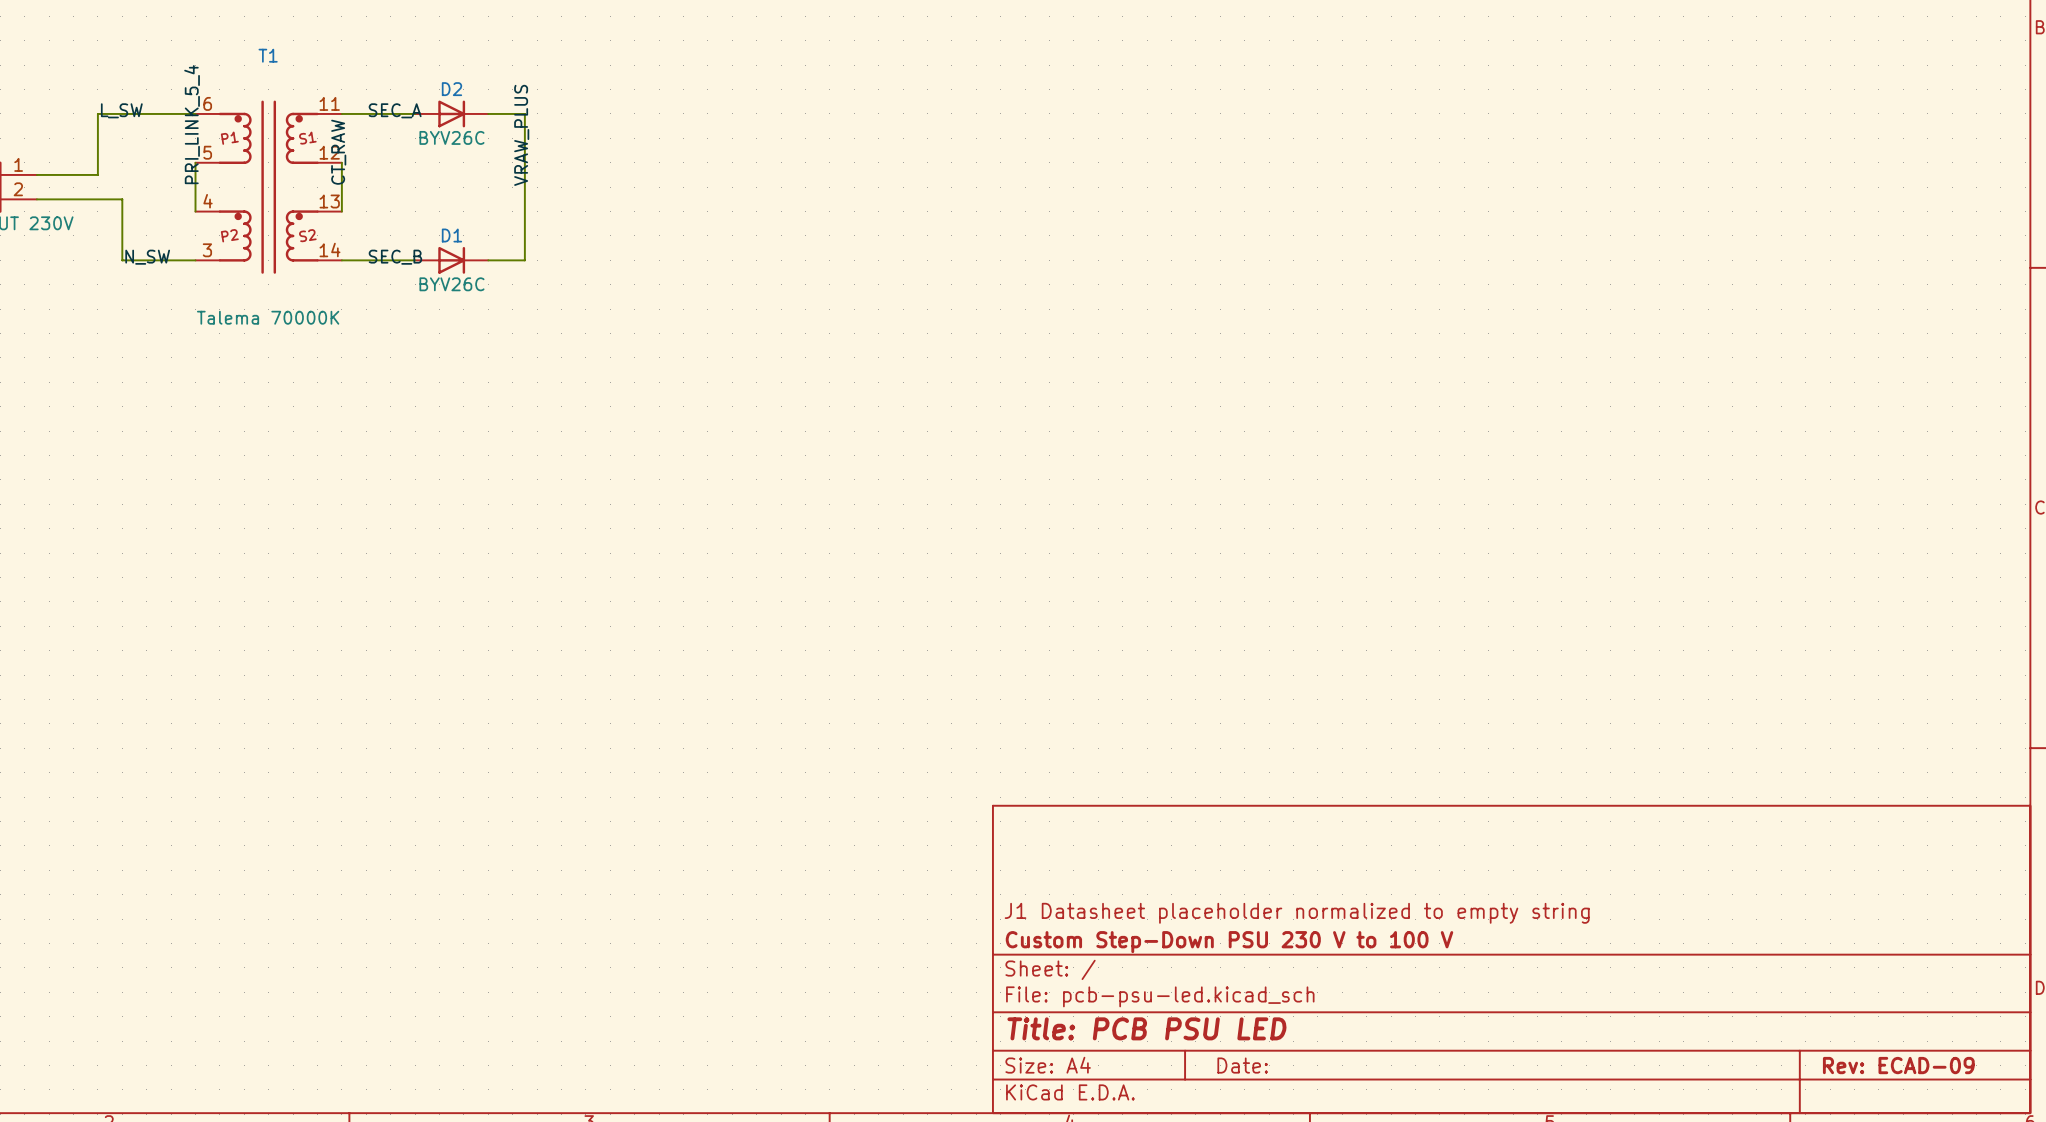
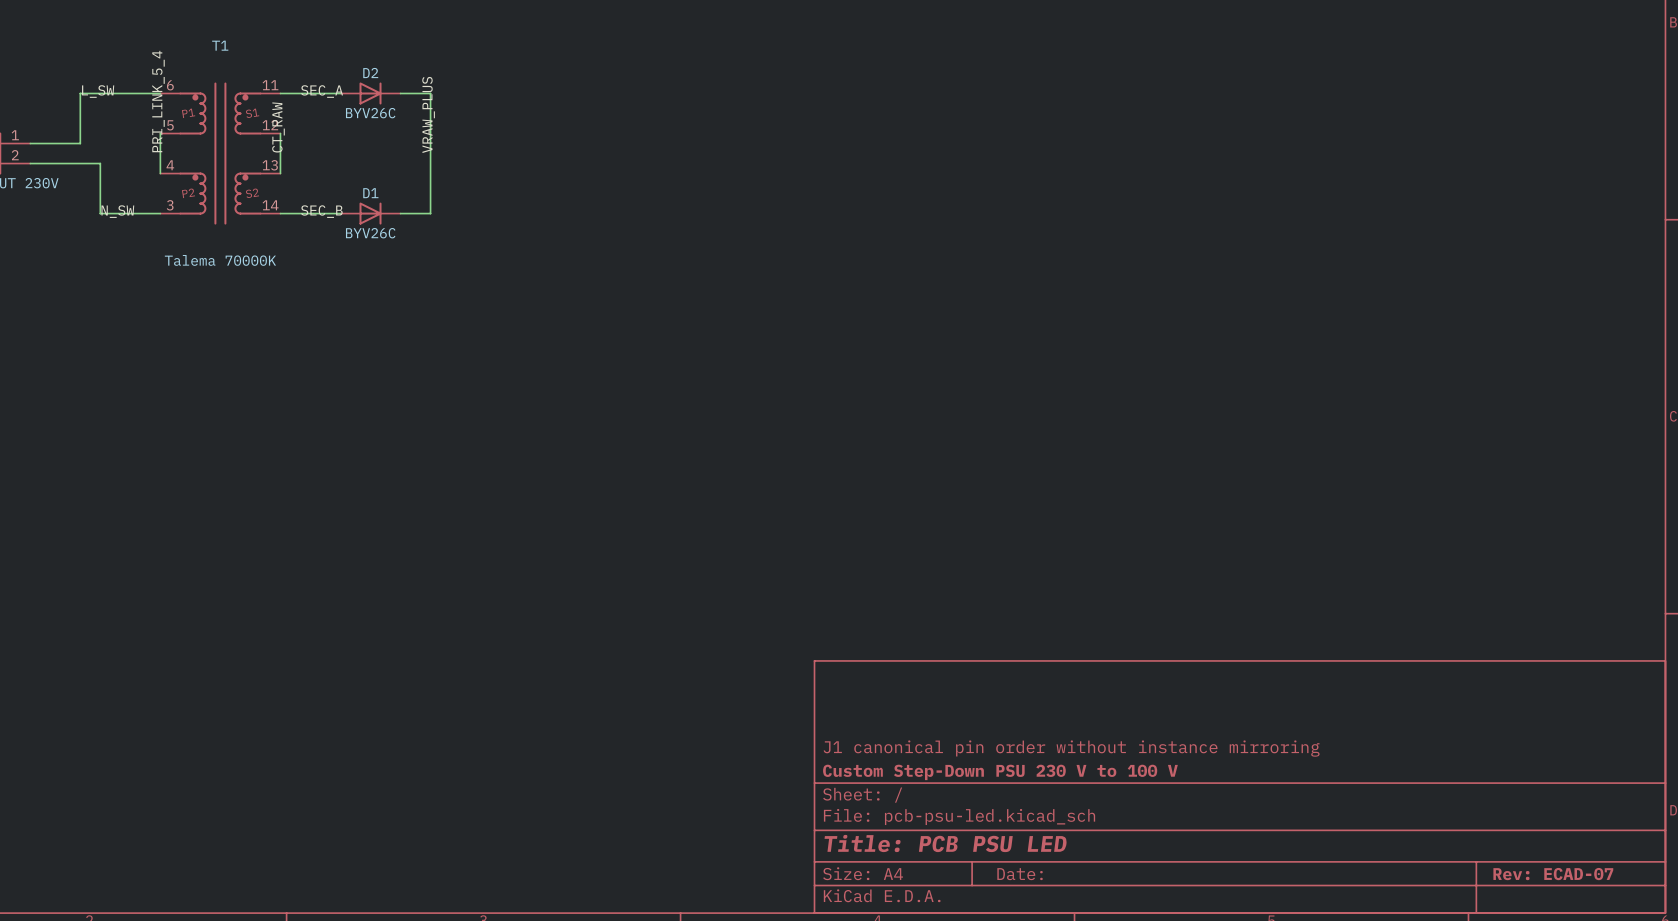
title block: J1 Datasheet placeholder normalized to empty string (1297, 913) -> J1 canonical pin order without instance mirroring (1071, 748)
title block: Rev: ECAD-09 (1898, 1065) -> Rev: ECAD-07 (1553, 874)

